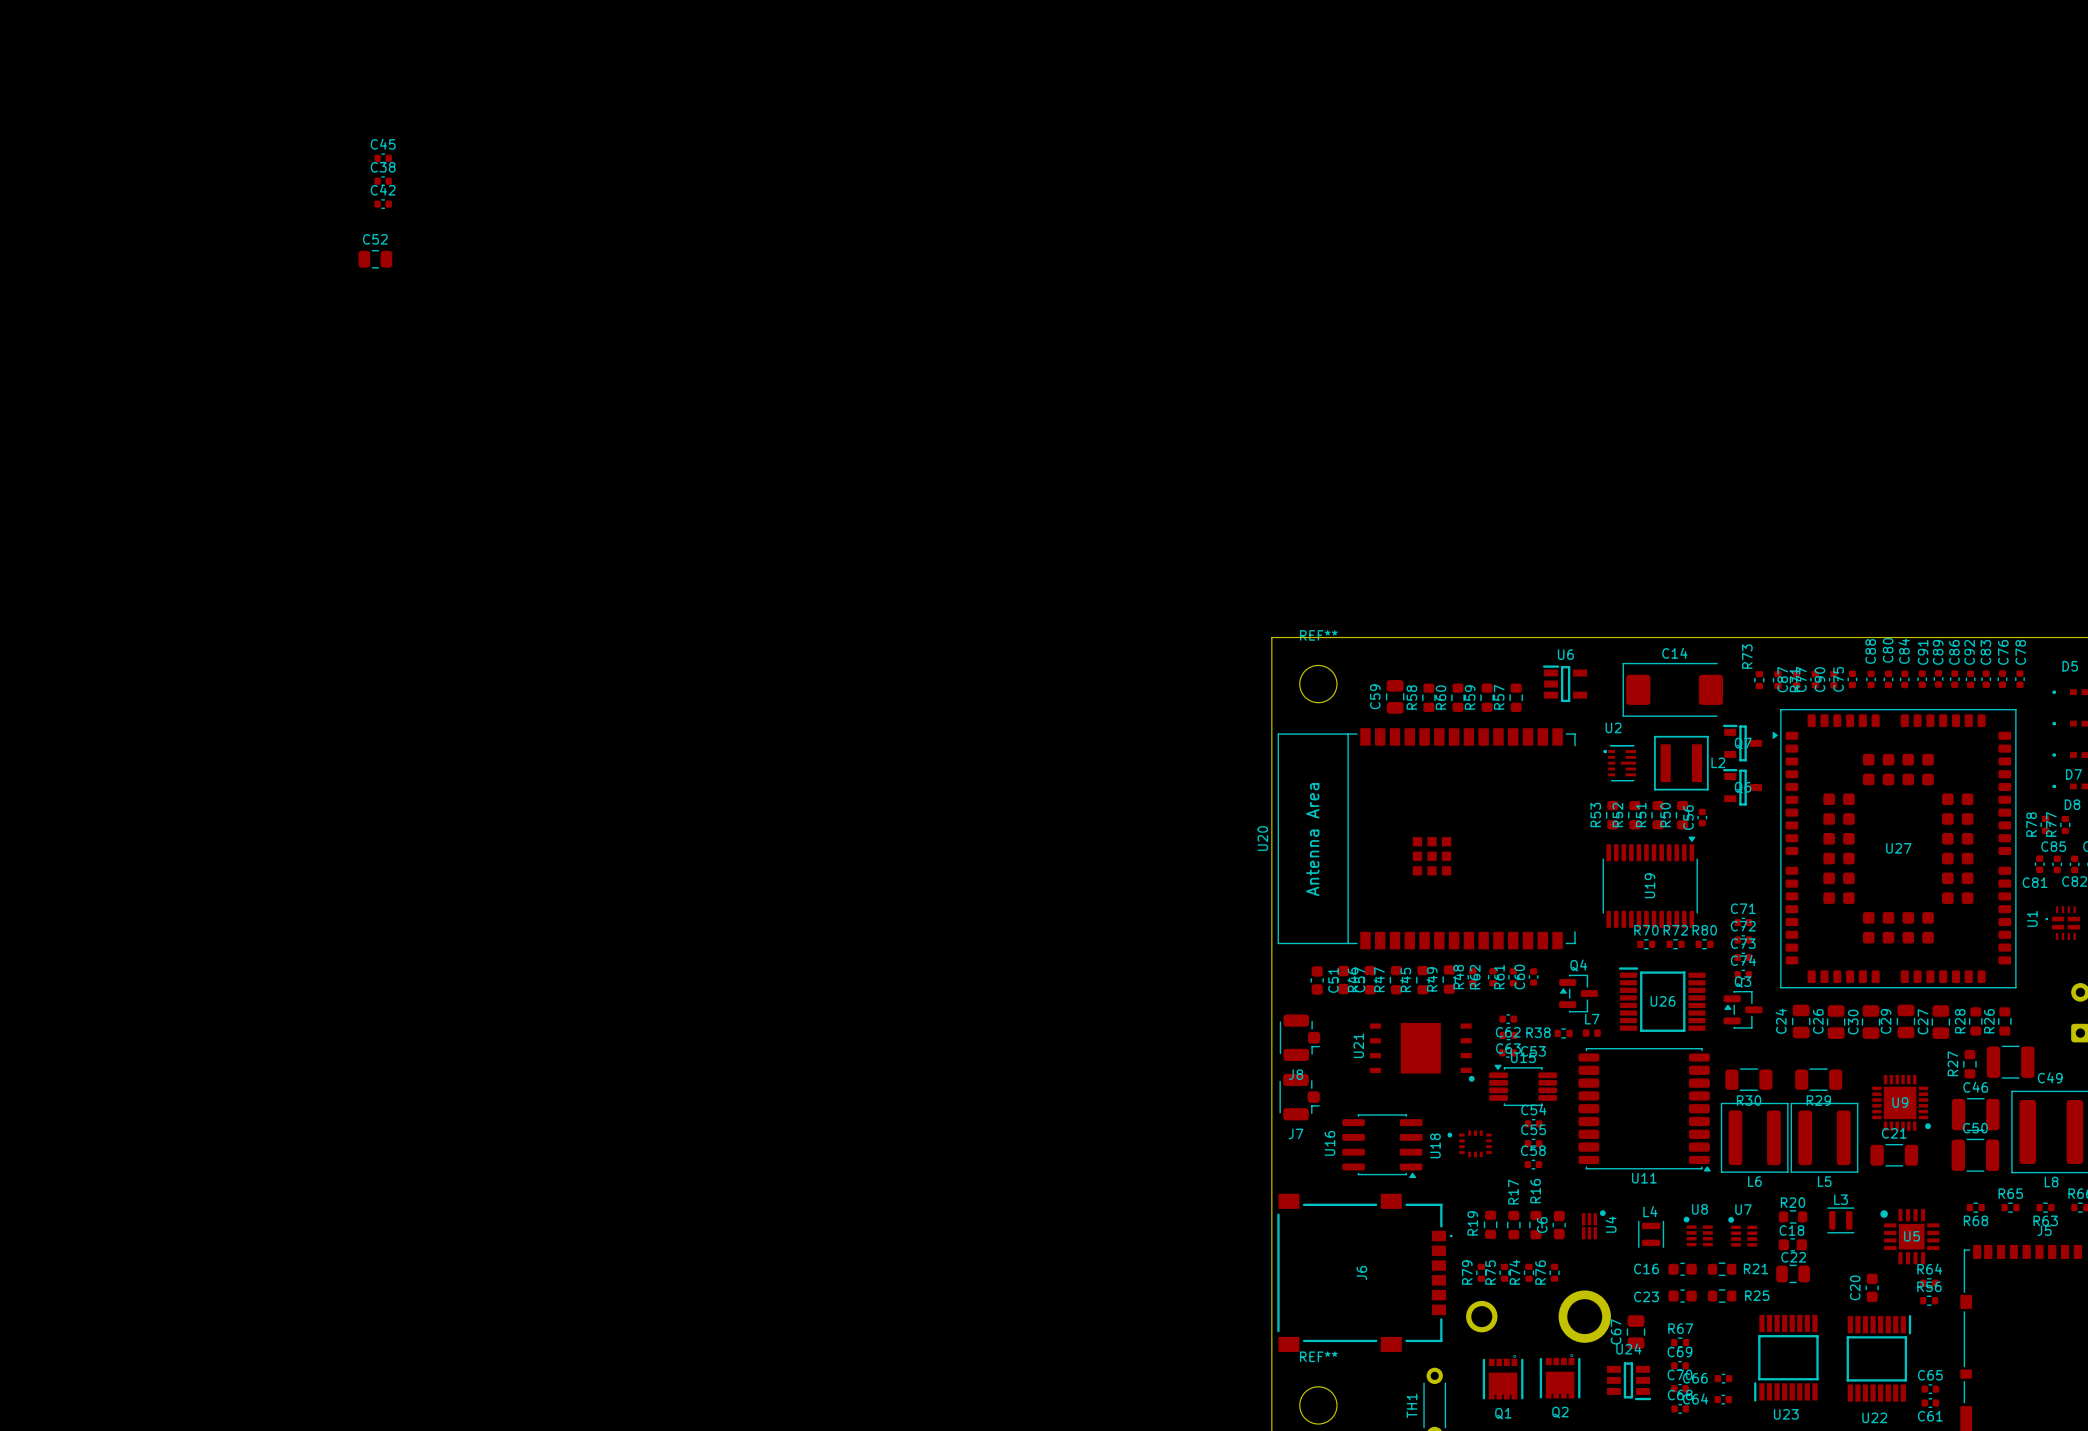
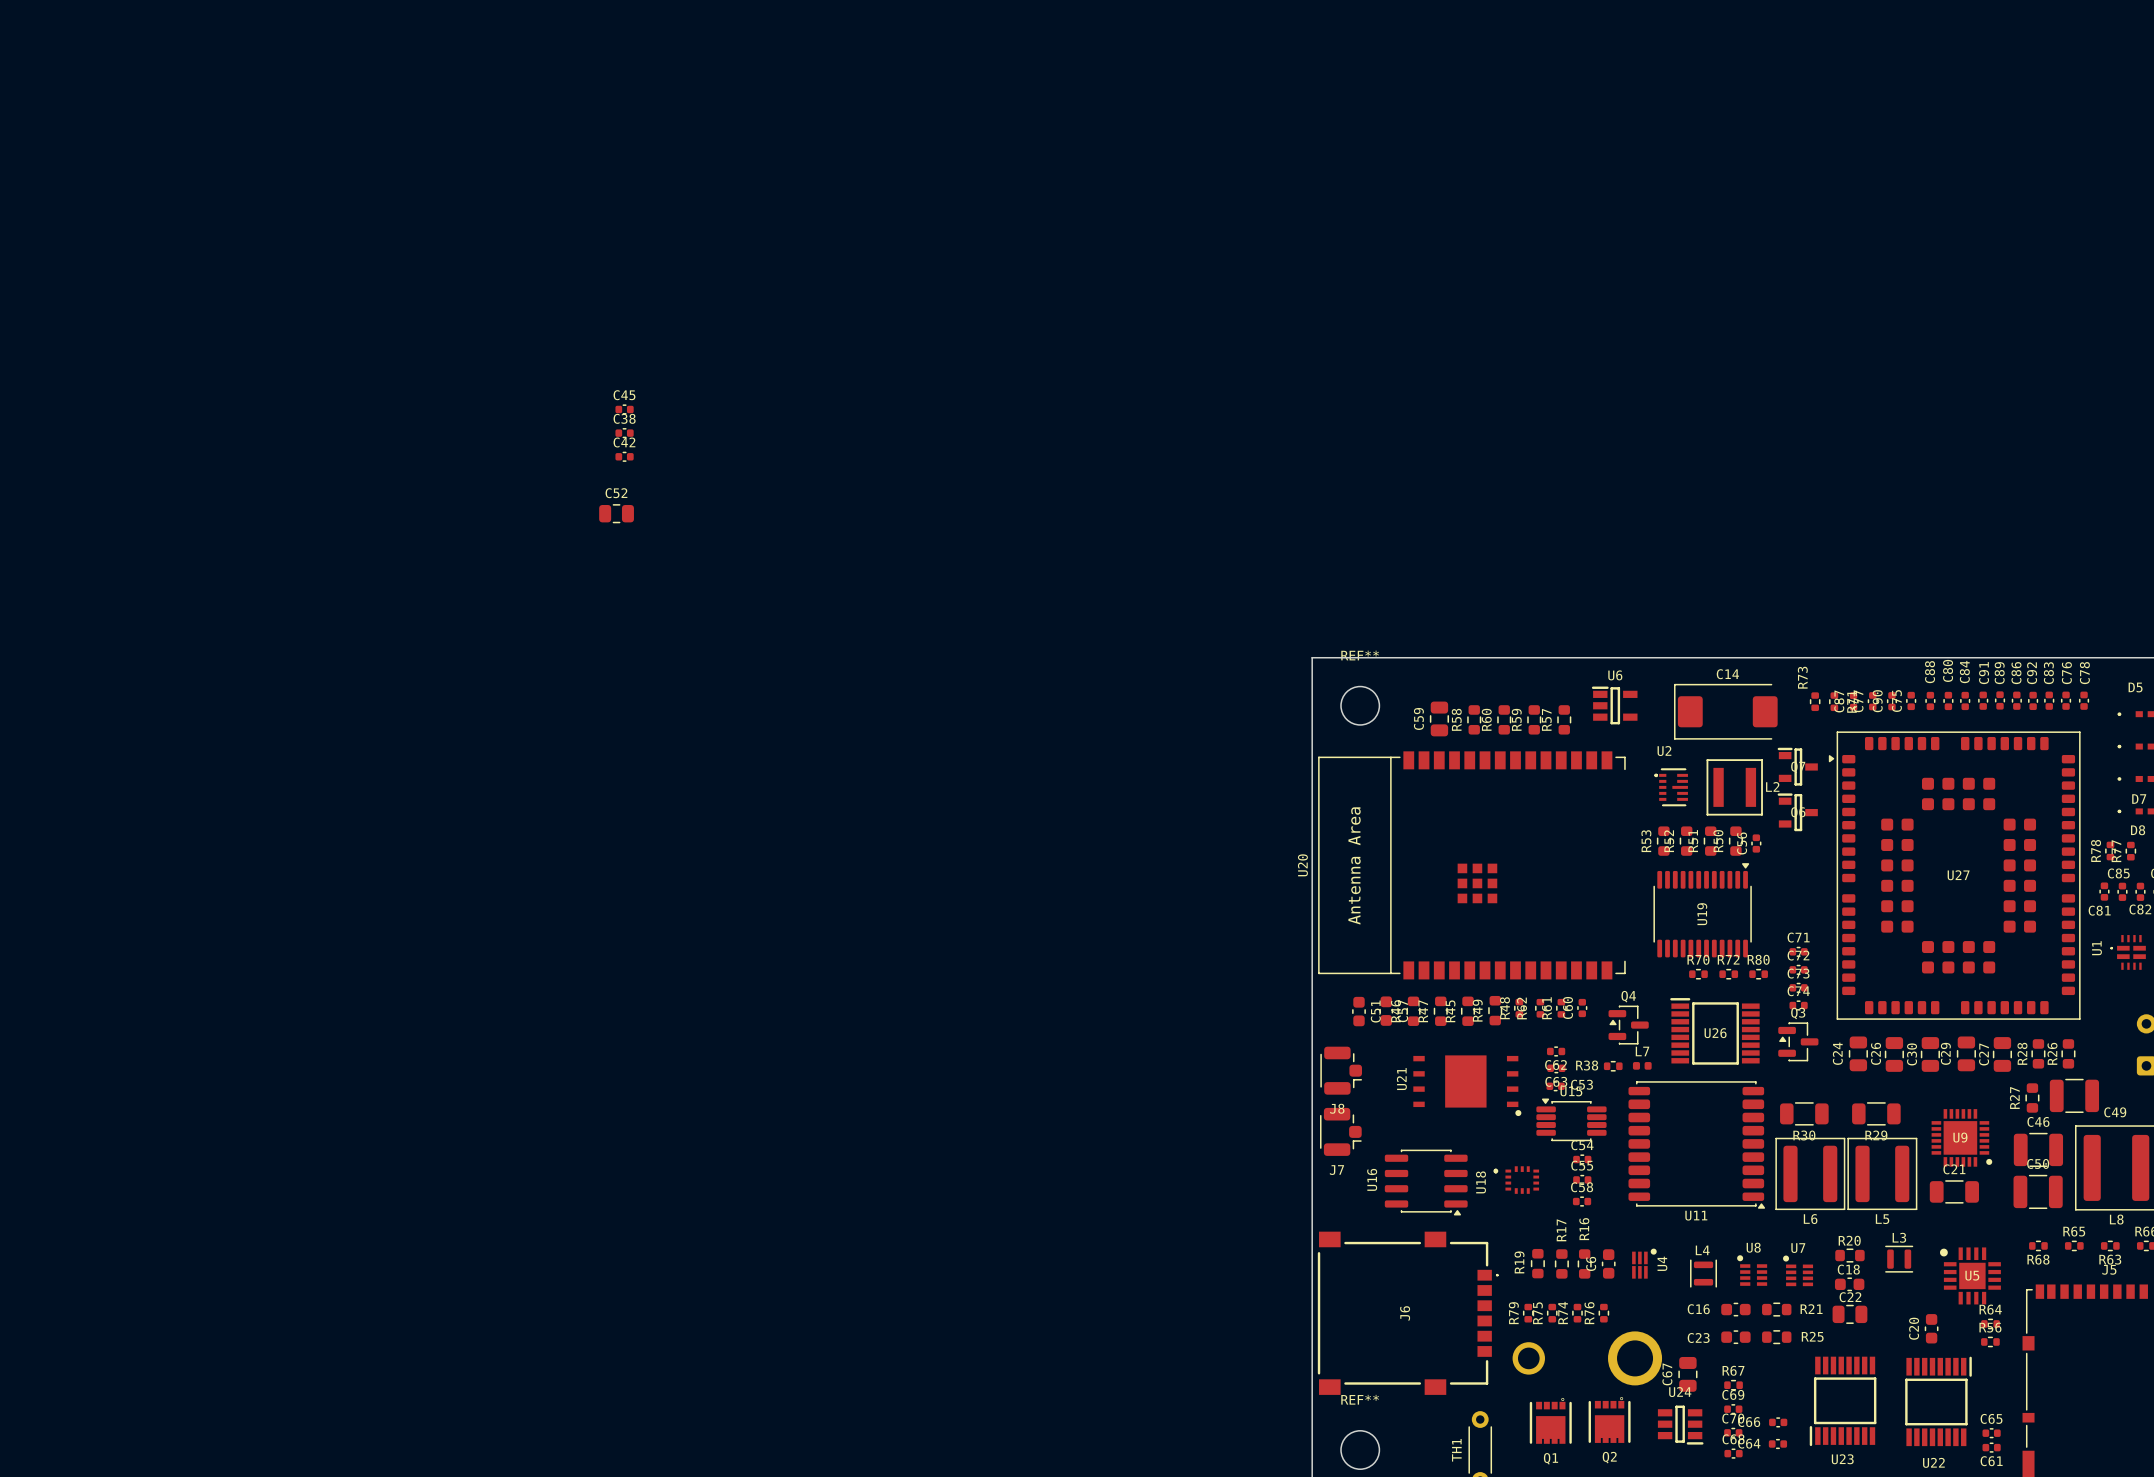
C45 position: (383, 158) -> (624, 409)
C38 position: (383, 181) -> (624, 433)
C42 position: (383, 204) -> (624, 456)
C52 position: (375, 259) -> (616, 513)

